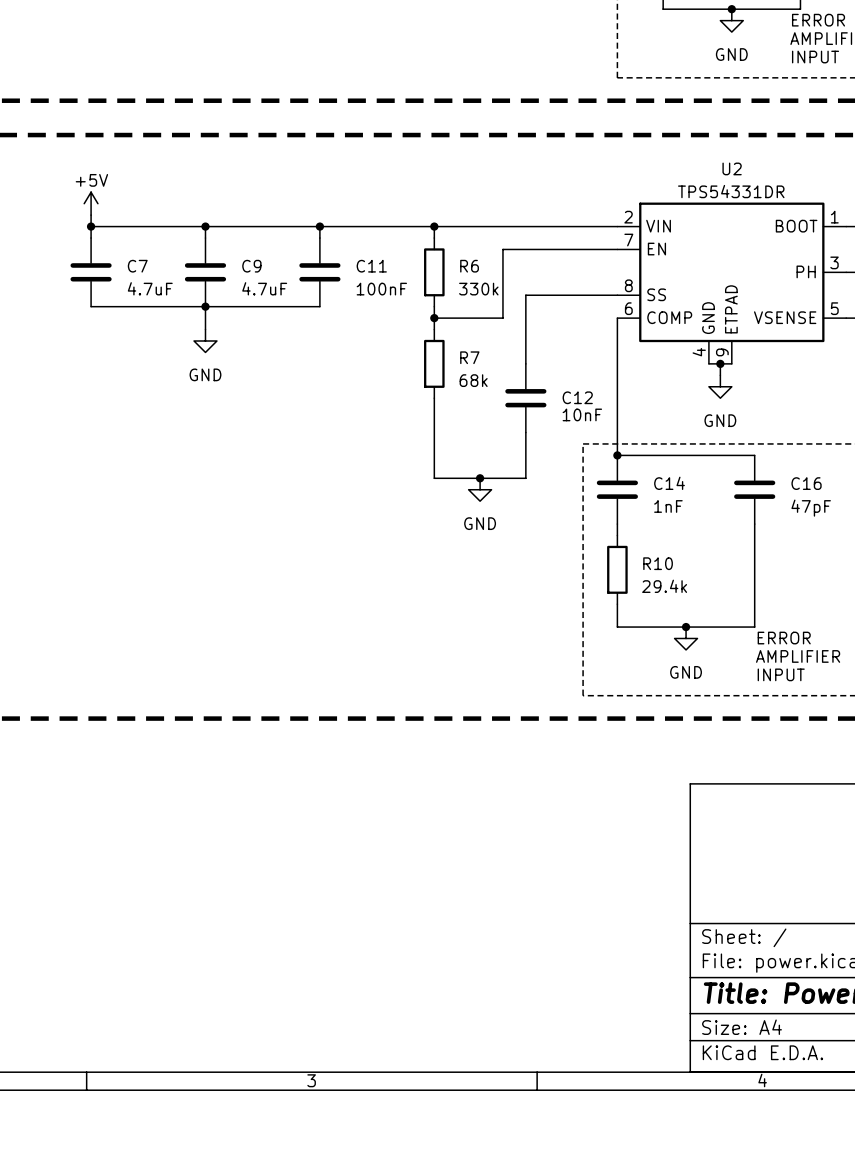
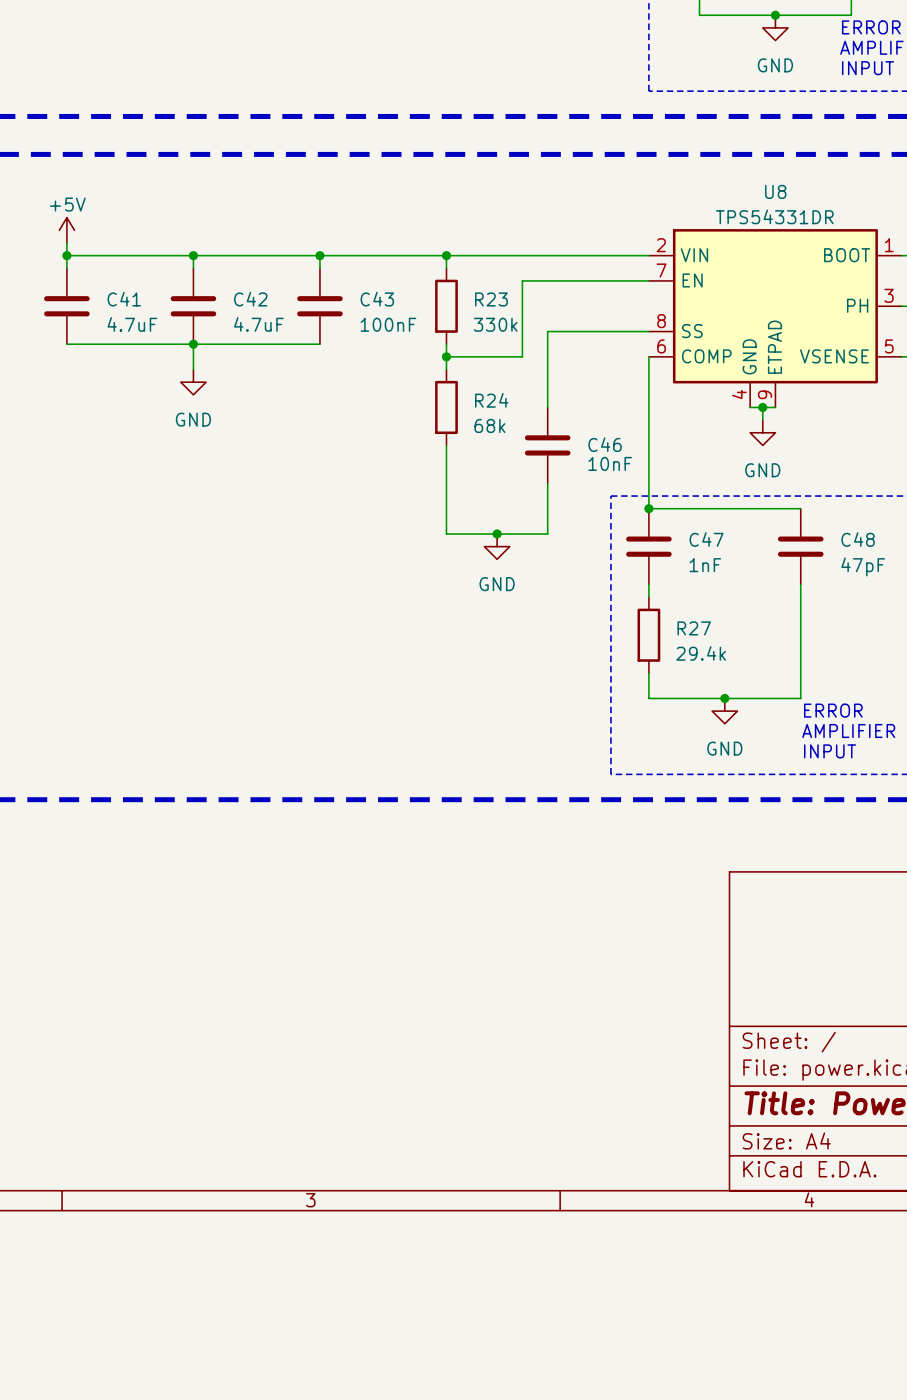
U2 name: U2 (732, 168) -> U8 (775, 191)
C7 name: C7 (137, 266) -> C41 (124, 299)
C9 name: C9 (251, 266) -> C42 (250, 299)
C11 name: C11 (371, 266) -> C43 (377, 299)
R6 name: R6 (469, 266) -> R23 (491, 299)
R7 name: R7 (469, 357) -> R24 (491, 400)
C12 name: C12 (577, 397) -> C46 (605, 444)
C14 name: C14 (669, 483) -> C47 (706, 539)
C16 name: C16 (806, 483) -> C48 (858, 539)
R10 name: R10 (658, 563) -> R27 (694, 628)

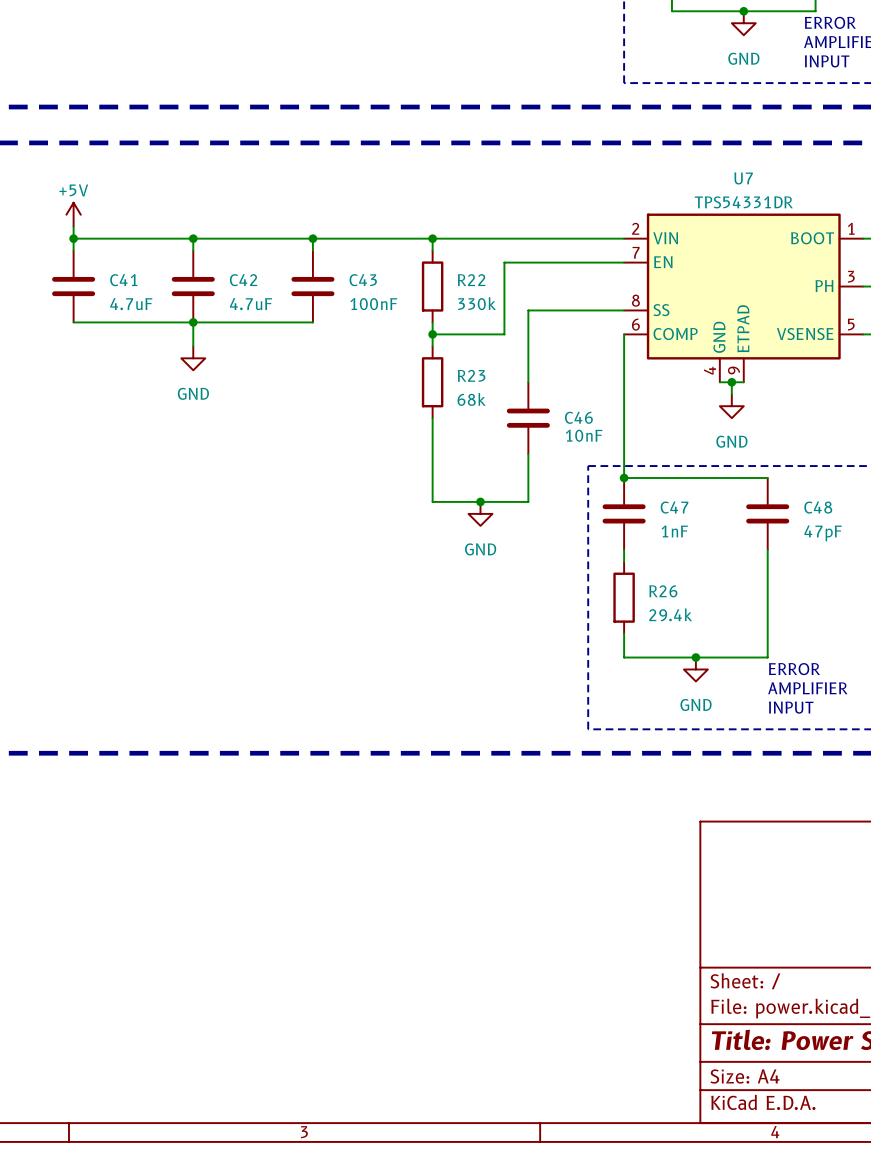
U8 name: U8 (775, 191) -> U7 (743, 178)
R23 name: R23 (491, 299) -> R22 (471, 280)
R24 name: R24 (491, 400) -> R23 (471, 375)
R27 name: R27 (694, 628) -> R26 (663, 591)

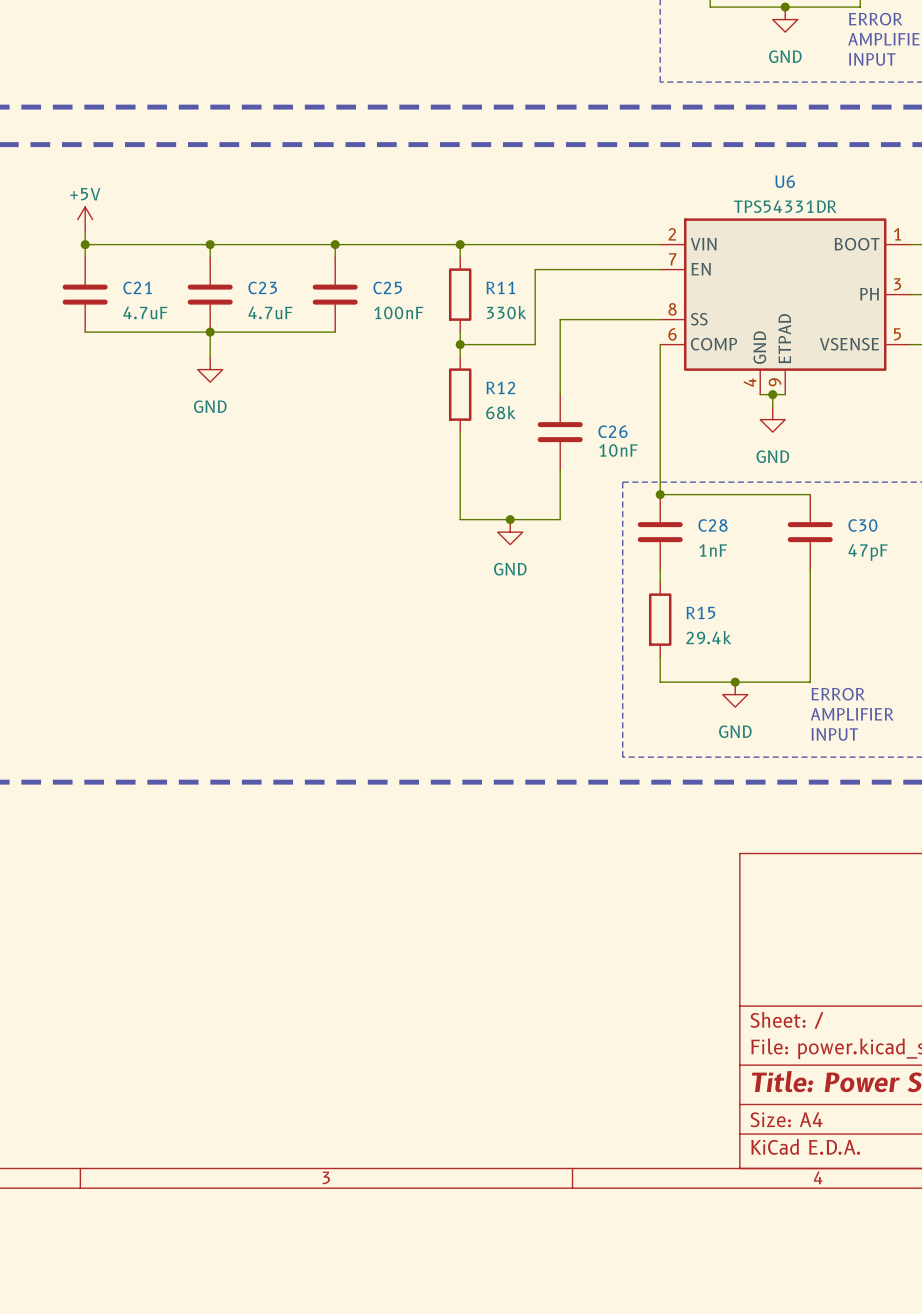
U7 name: U7 (743, 178) -> U6 (785, 181)
C41 name: C41 (123, 280) -> C21 (137, 287)
C42 name: C42 (243, 280) -> C23 (262, 287)
C43 name: C43 (363, 280) -> C25 (387, 287)
R22 name: R22 (471, 280) -> R11 (500, 287)
R23 name: R23 (471, 375) -> R12 (500, 387)
C46 name: C46 (578, 417) -> C26 (613, 431)
C47 name: C47 (674, 507) -> C28 (713, 525)
C48 name: C48 (818, 507) -> C30 (862, 525)
R26 name: R26 (663, 591) -> R15 (700, 612)

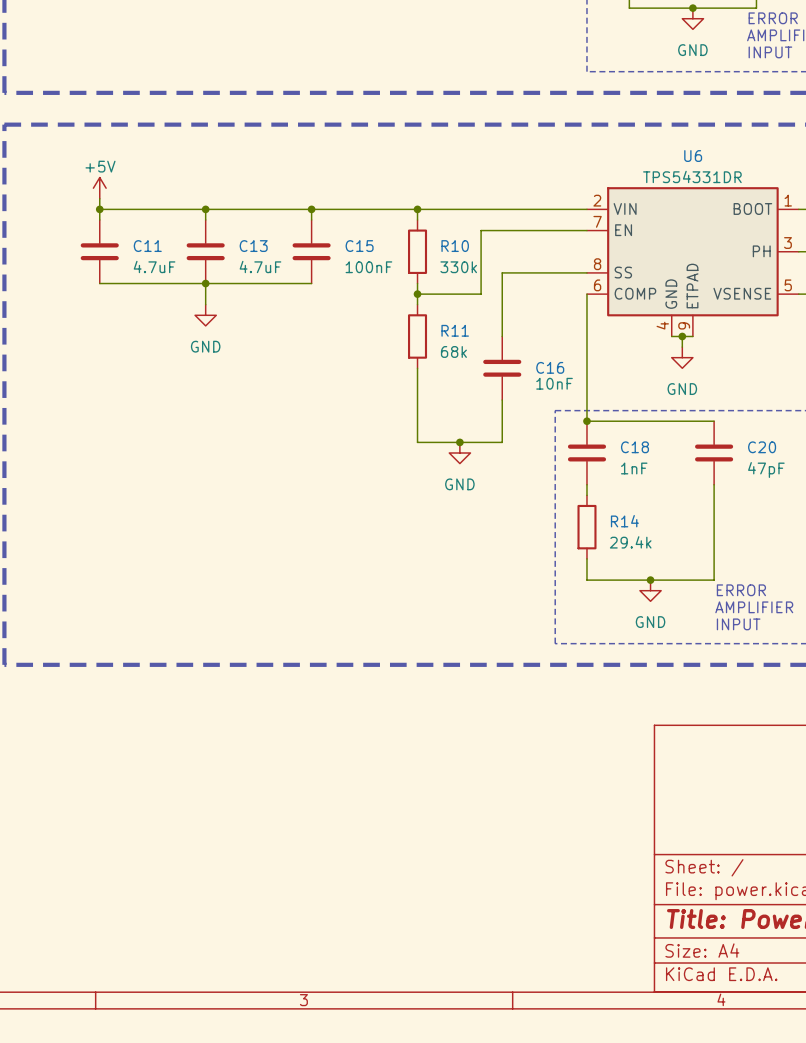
C21 name: C21 (137, 287) -> C11 (147, 246)
C23 name: C23 (262, 287) -> C13 (253, 246)
C25 name: C25 (387, 287) -> C15 (359, 246)
R11 name: R11 (500, 287) -> R10 (455, 246)
R12 name: R12 (500, 387) -> R11 (455, 330)
C26 name: C26 (613, 431) -> C16 (550, 367)
C28 name: C28 (713, 525) -> C18 (634, 447)
C30 name: C30 (862, 525) -> C20 (762, 447)
R15 name: R15 (700, 612) -> R14 (624, 521)

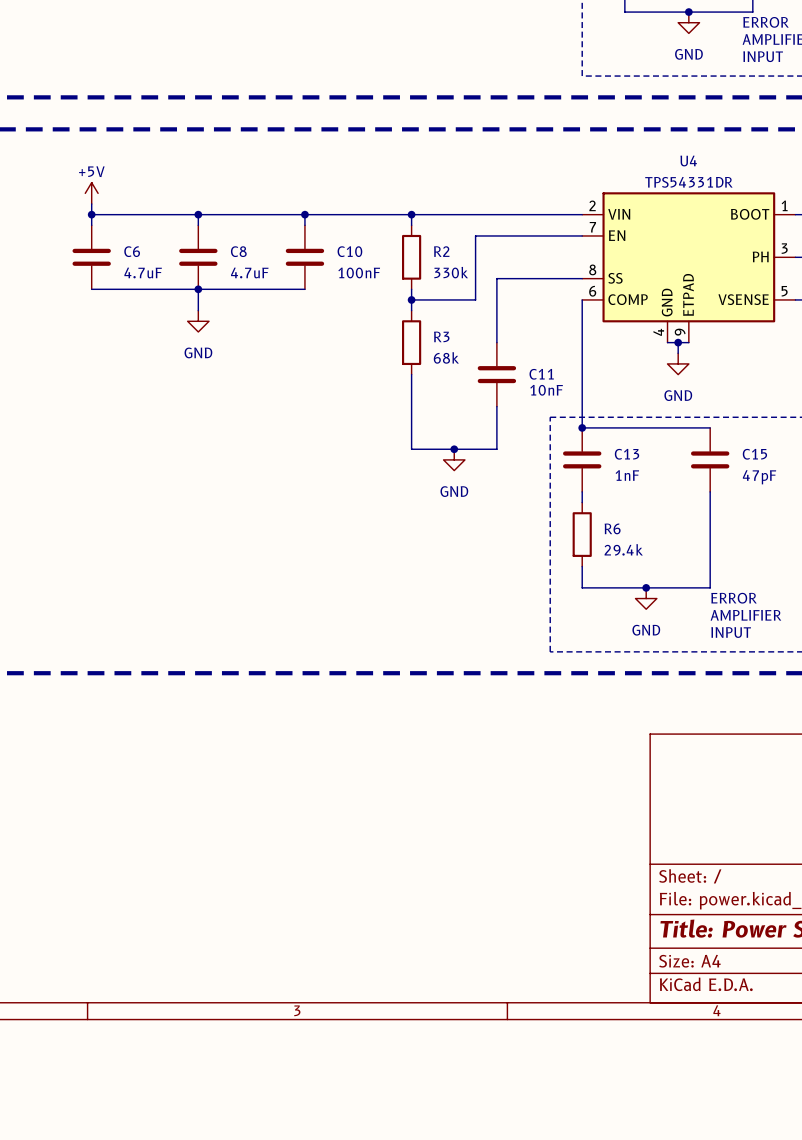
U6 name: U6 (693, 156) -> U4 (688, 161)
C11 name: C11 (147, 246) -> C6 (132, 251)
C13 name: C13 (253, 246) -> C8 (238, 251)
C15 name: C15 (359, 246) -> C10 (349, 251)
R10 name: R10 (455, 246) -> R2 (441, 251)
R11 name: R11 (455, 330) -> R3 (441, 336)
C16 name: C16 (550, 367) -> C11 (541, 374)
C18 name: C18 (634, 447) -> C13 (627, 454)
C20 name: C20 (762, 447) -> C15 (754, 454)
R14 name: R14 (624, 521) -> R6 (612, 528)

